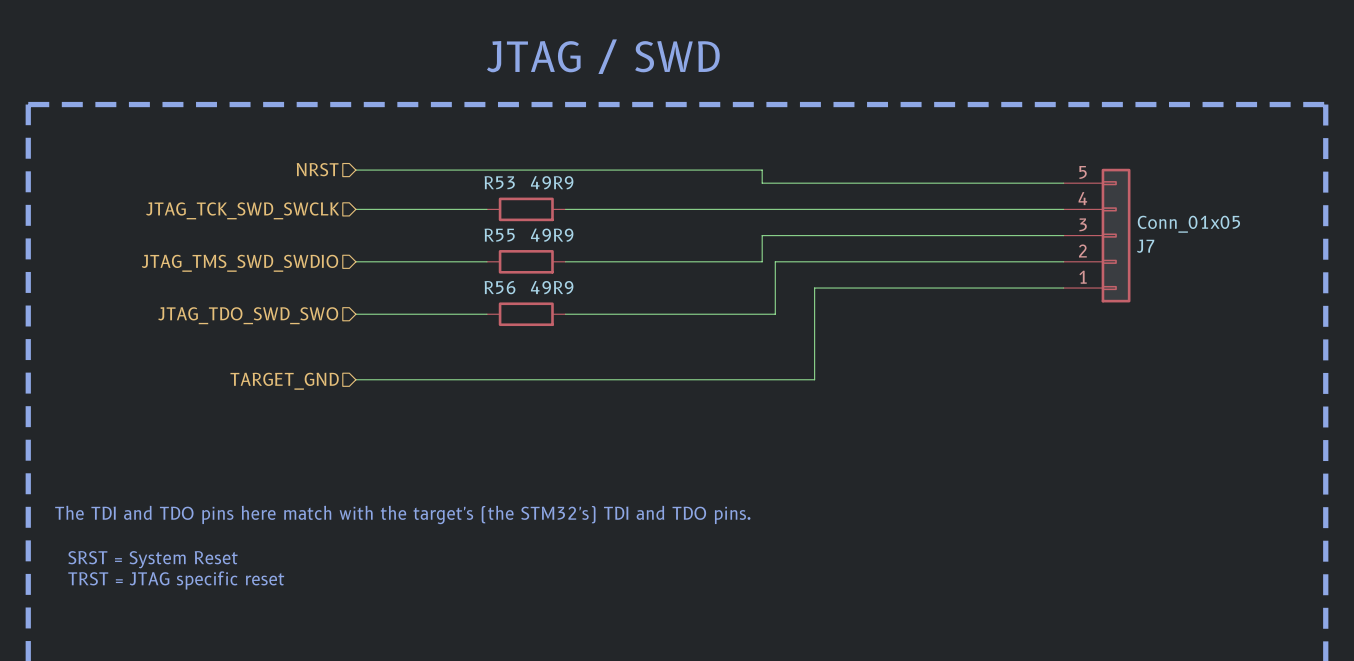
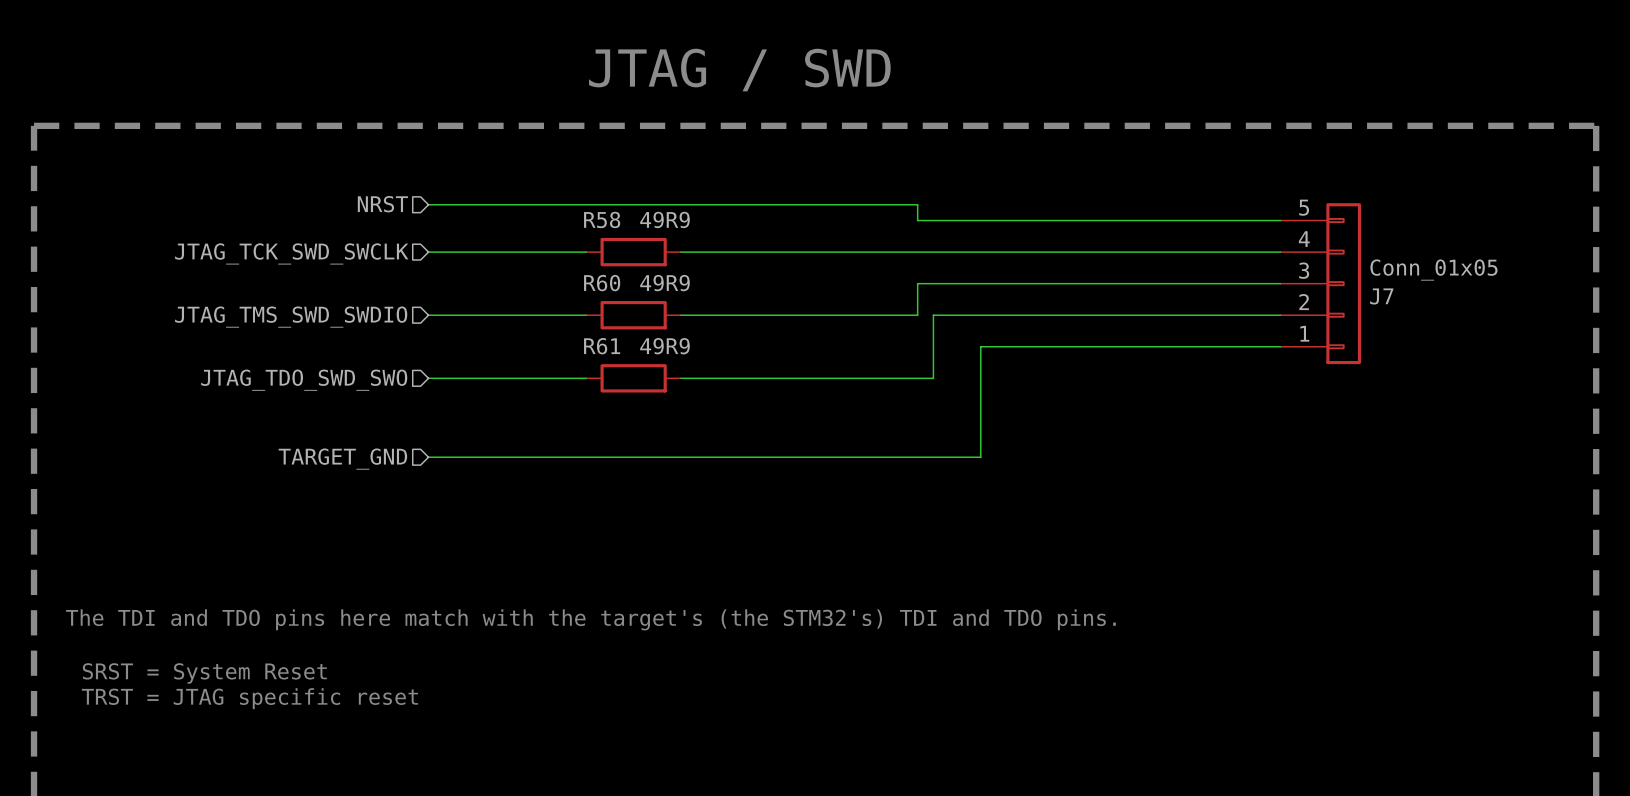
R53 name: R53 (499, 182) -> R58 (602, 219)
R55 name: R55 (499, 235) -> R60 (602, 283)
R56 name: R56 (499, 287) -> R61 (602, 346)

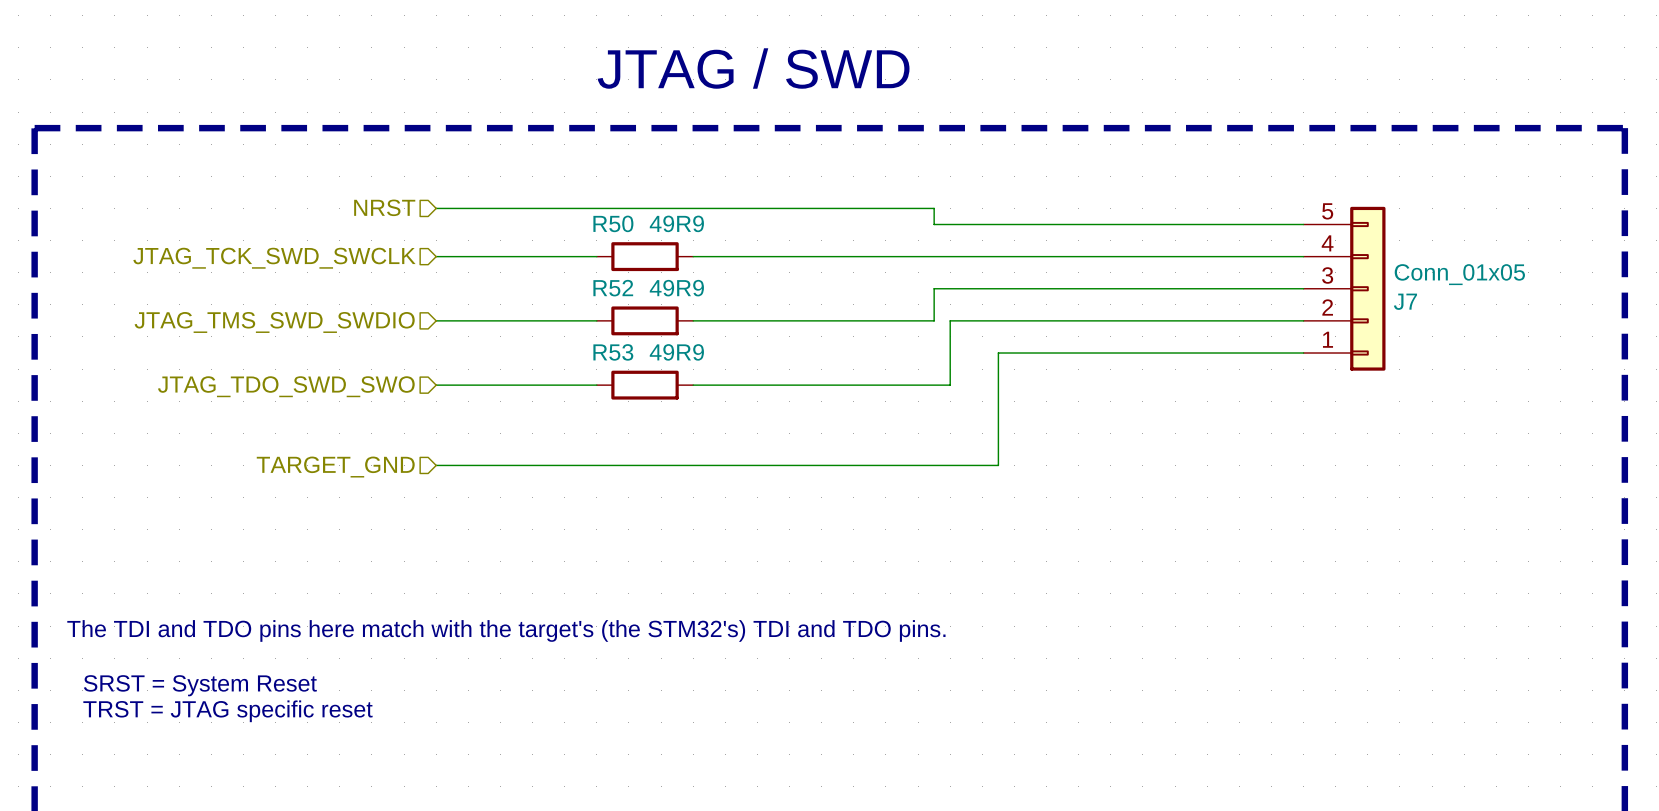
R58 name: R58 (602, 219) -> R50 (613, 223)
R60 name: R60 (602, 283) -> R52 (613, 288)
R61 name: R61 (602, 346) -> R53 (613, 352)

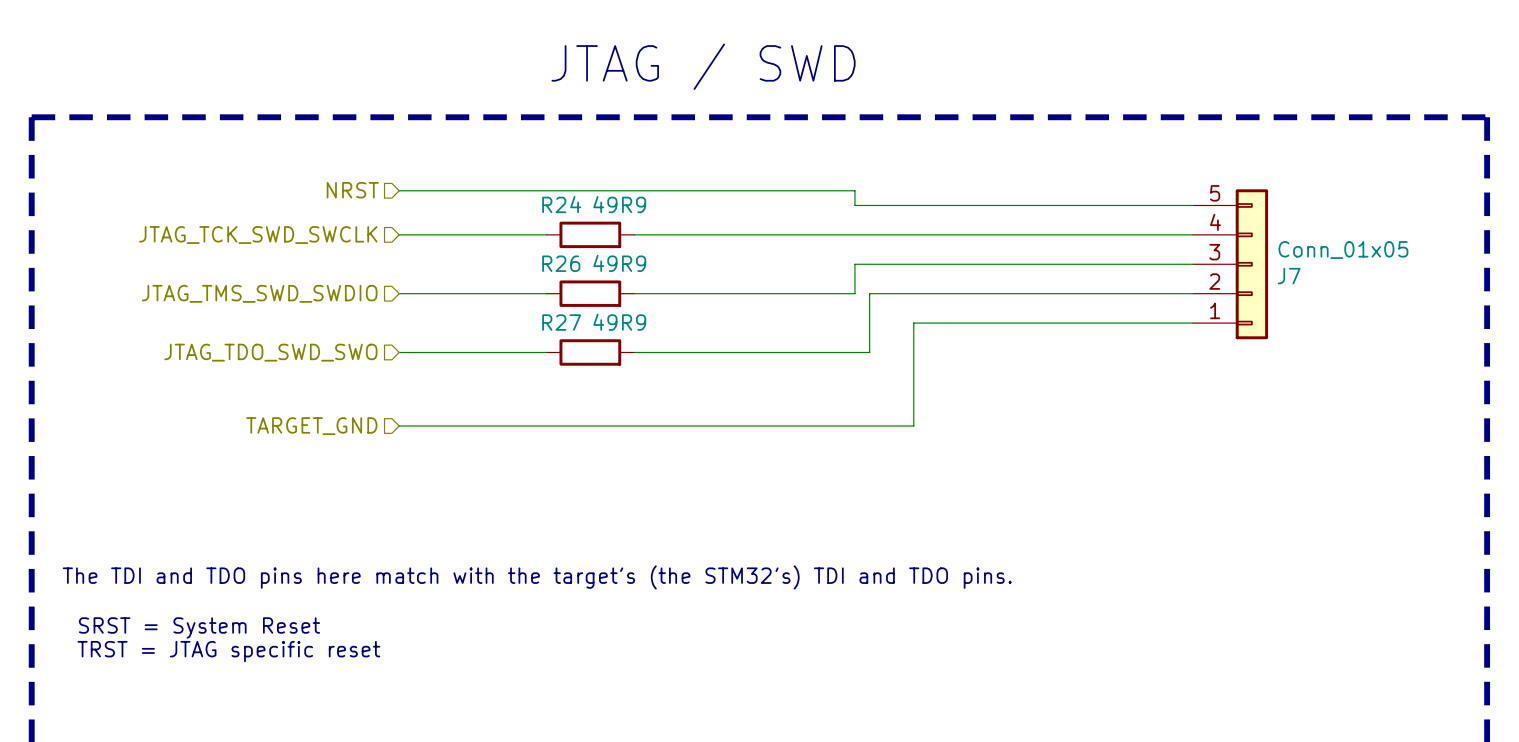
R50 name: R50 (613, 223) -> R24 (561, 204)
R52 name: R52 (613, 288) -> R26 (561, 263)
R53 name: R53 (613, 352) -> R27 (561, 322)

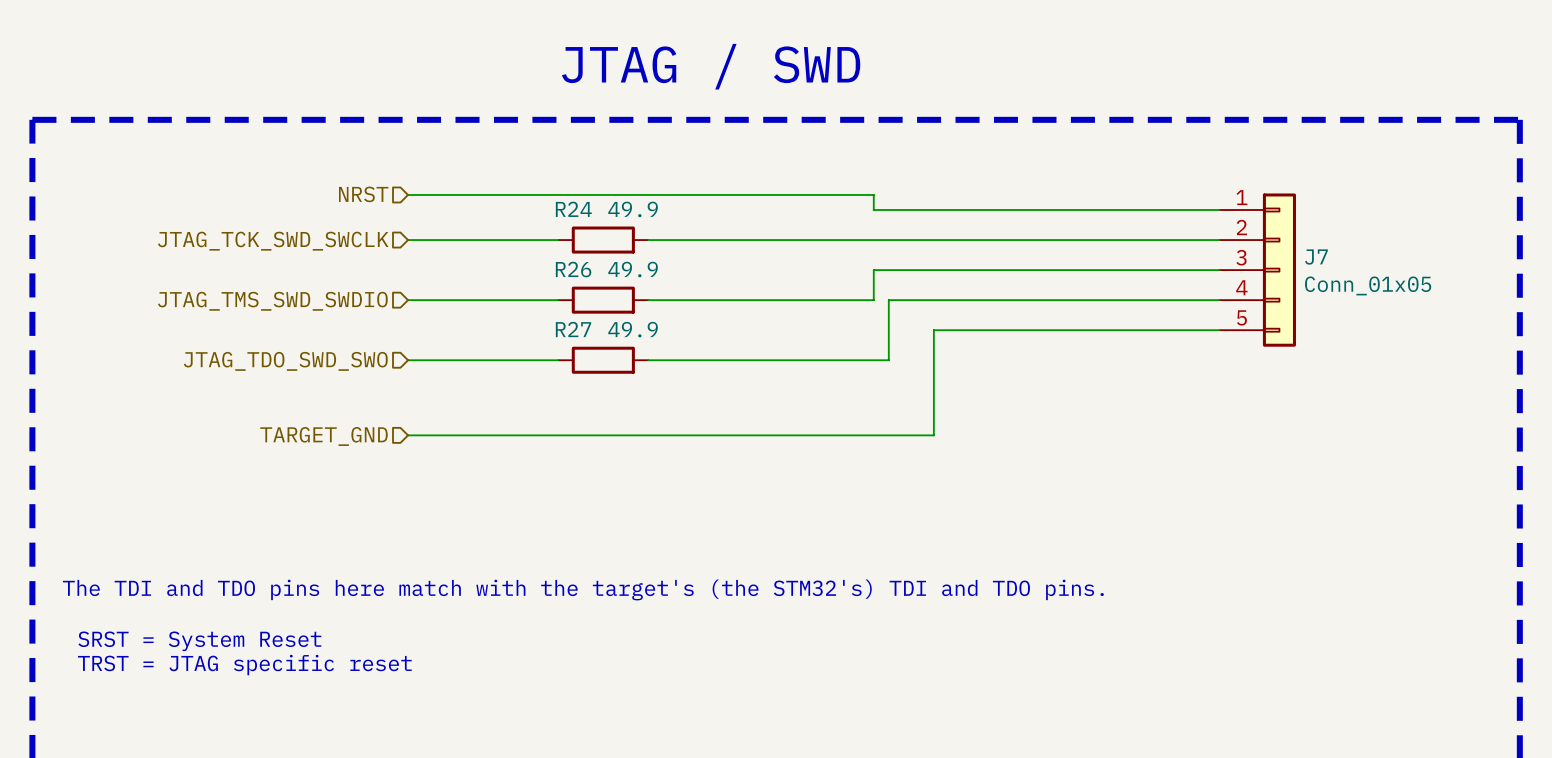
R24 value: 49R9 (619, 204) -> 49.9 (633, 209)
R26 value: 49R9 (619, 263) -> 49.9 (633, 269)
J7 flip: as is (1251, 264) -> up-down (1279, 270)
R27 value: 49R9 (619, 322) -> 49.9 (633, 329)

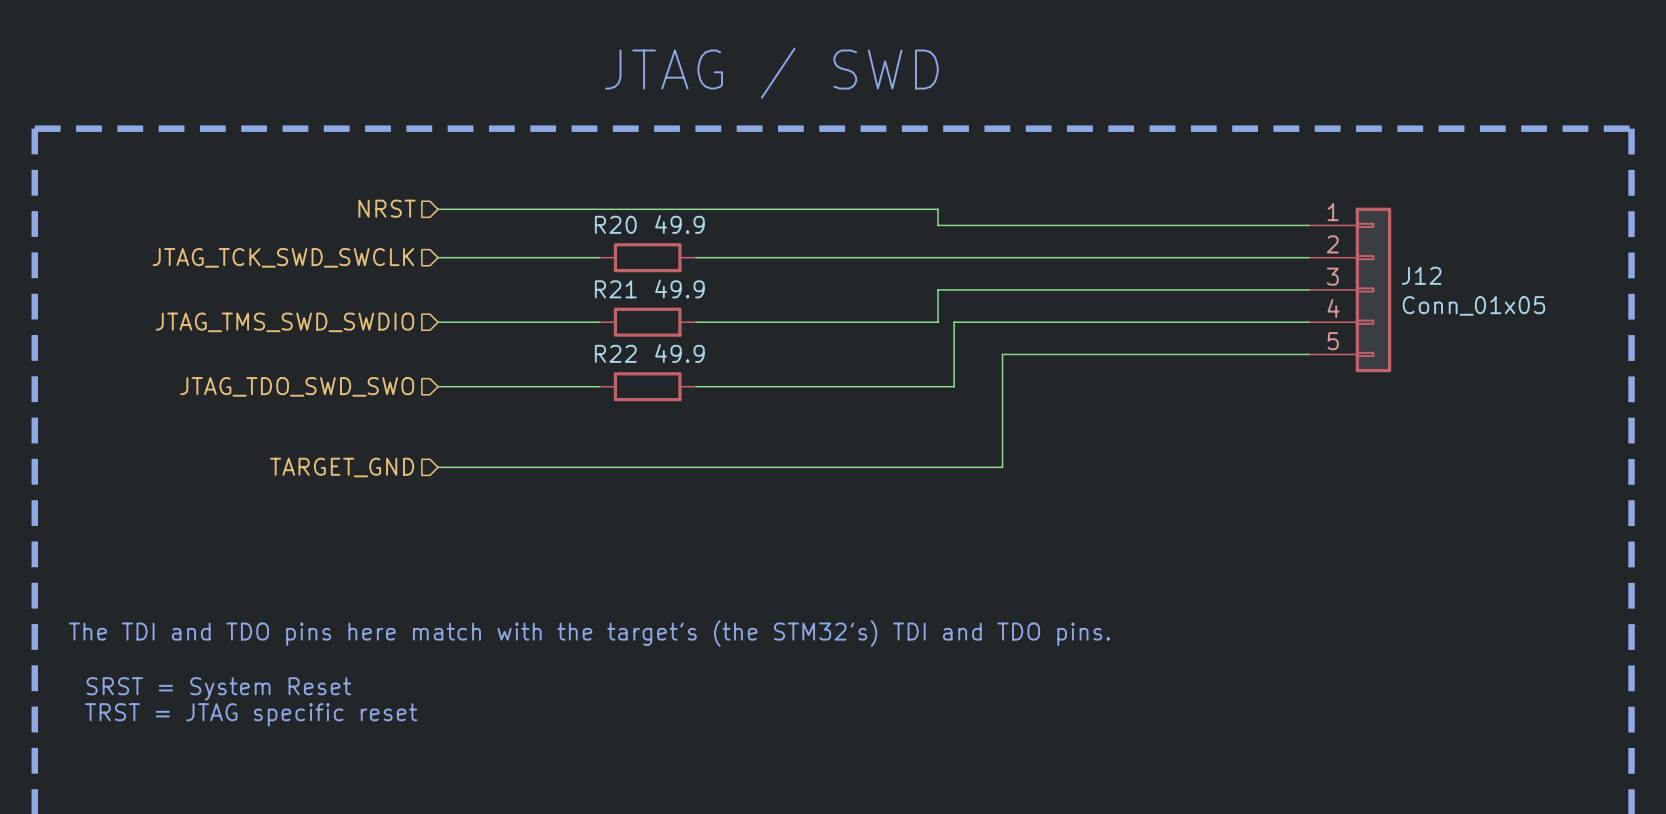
R24 name: R24 (573, 209) -> R20 (615, 224)
J7 name: J7 (1316, 257) -> J12 (1421, 275)
R26 name: R26 (573, 269) -> R21 (615, 289)
R27 name: R27 (573, 329) -> R22 (615, 353)

